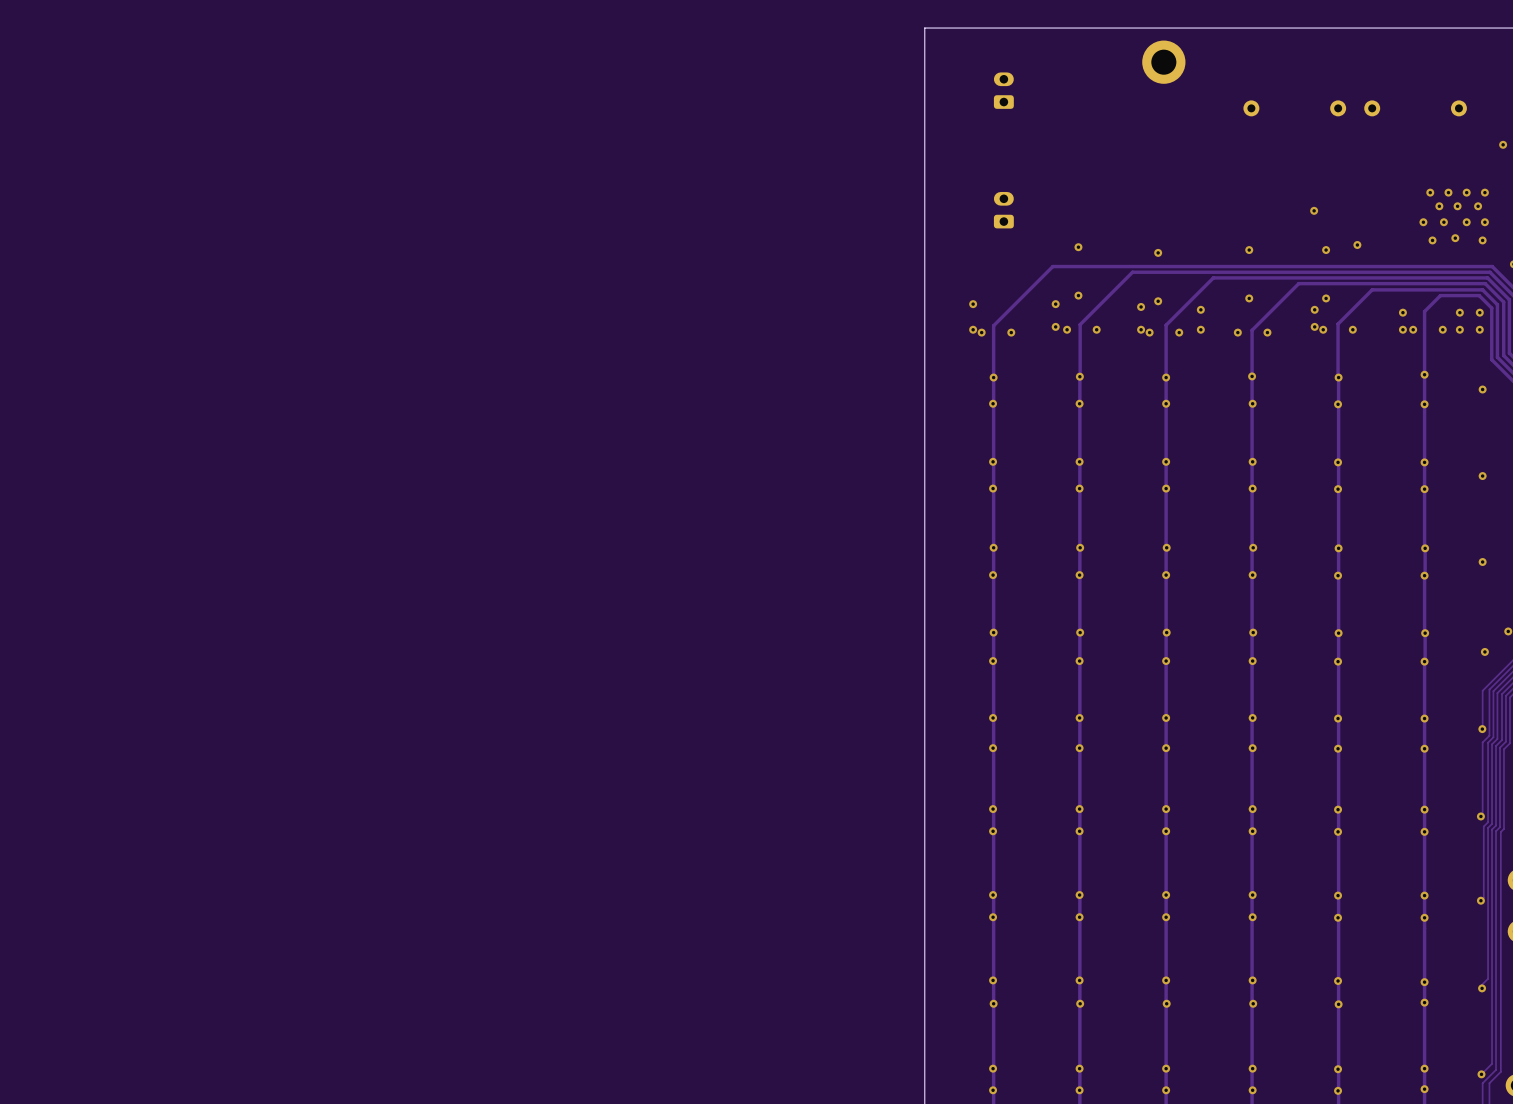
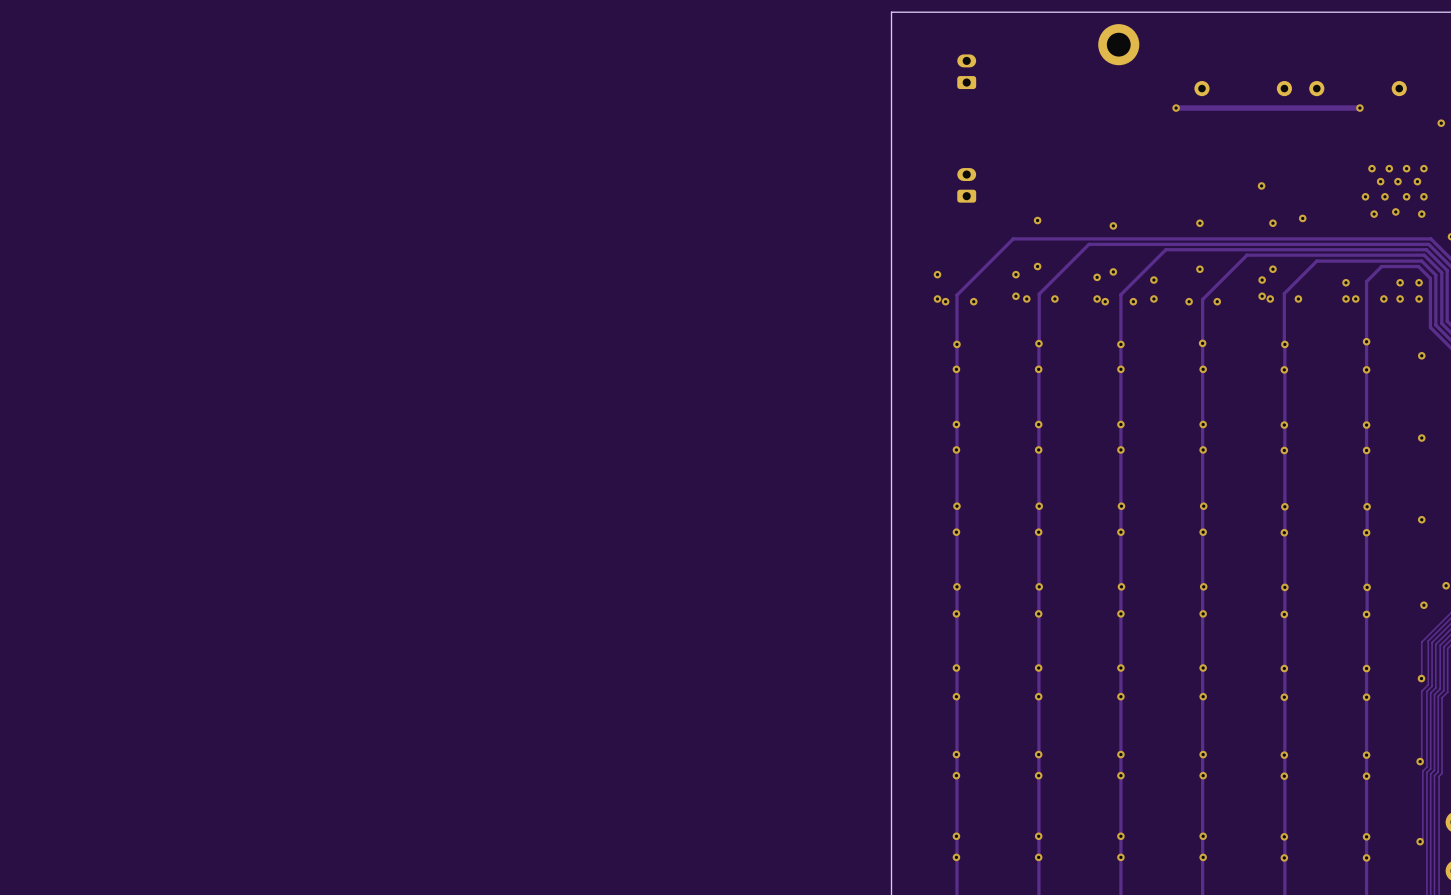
via: none -> (1176, 108)
track: none -> (1359, 108) (1176, 108)
via: none -> (1359, 108)

